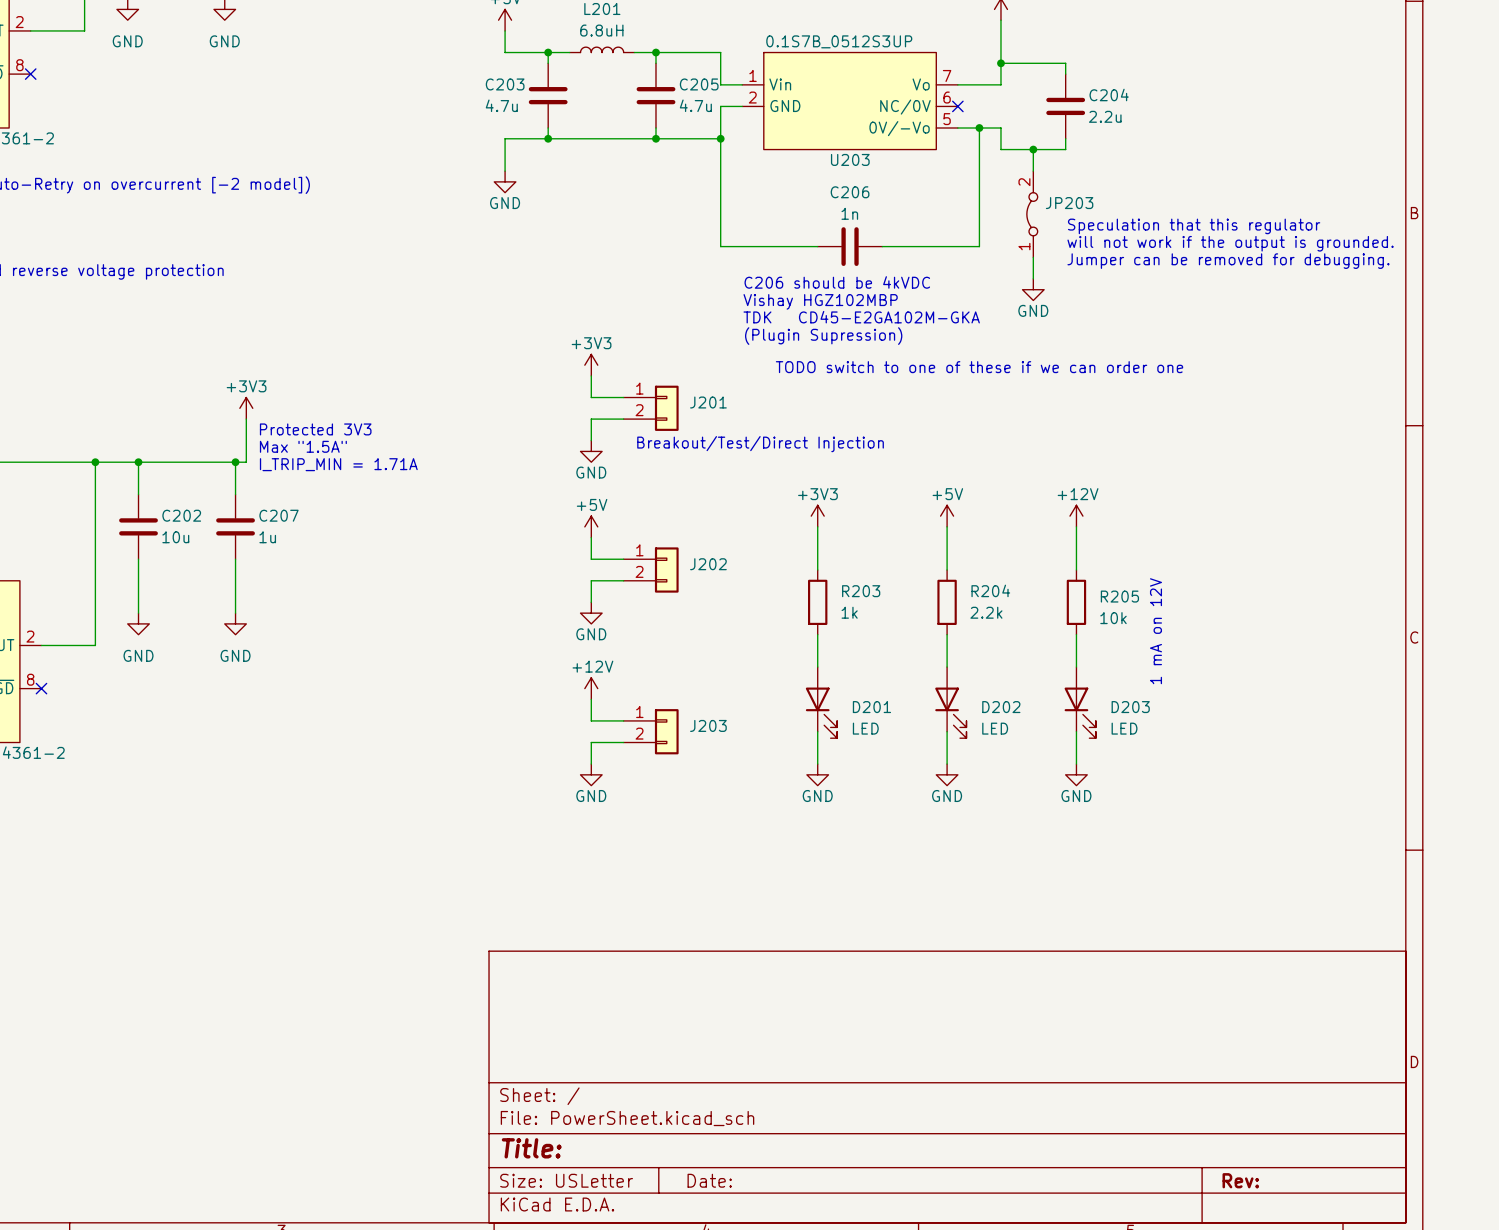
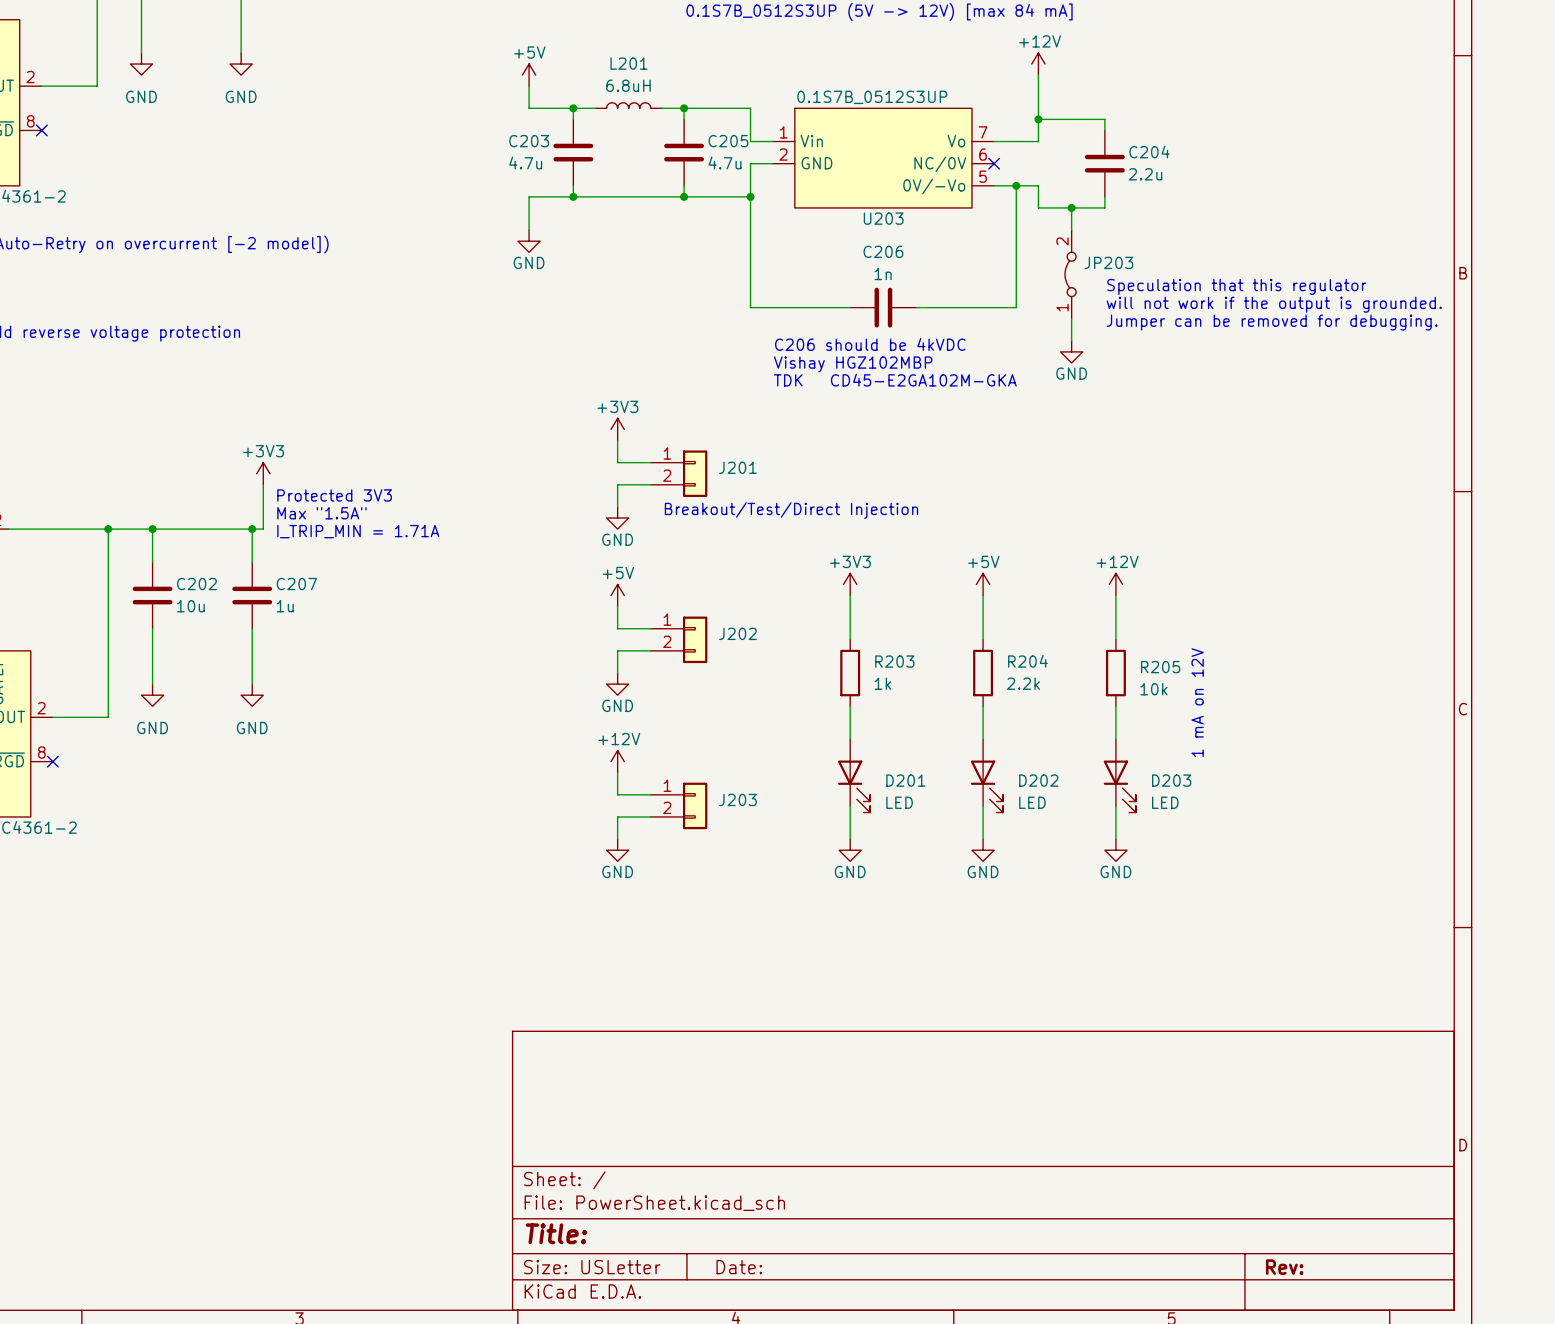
text: (Plugin Supression) (823, 336) -> none
text: TODO switch to one of these if we can order one (979, 367) -> none

